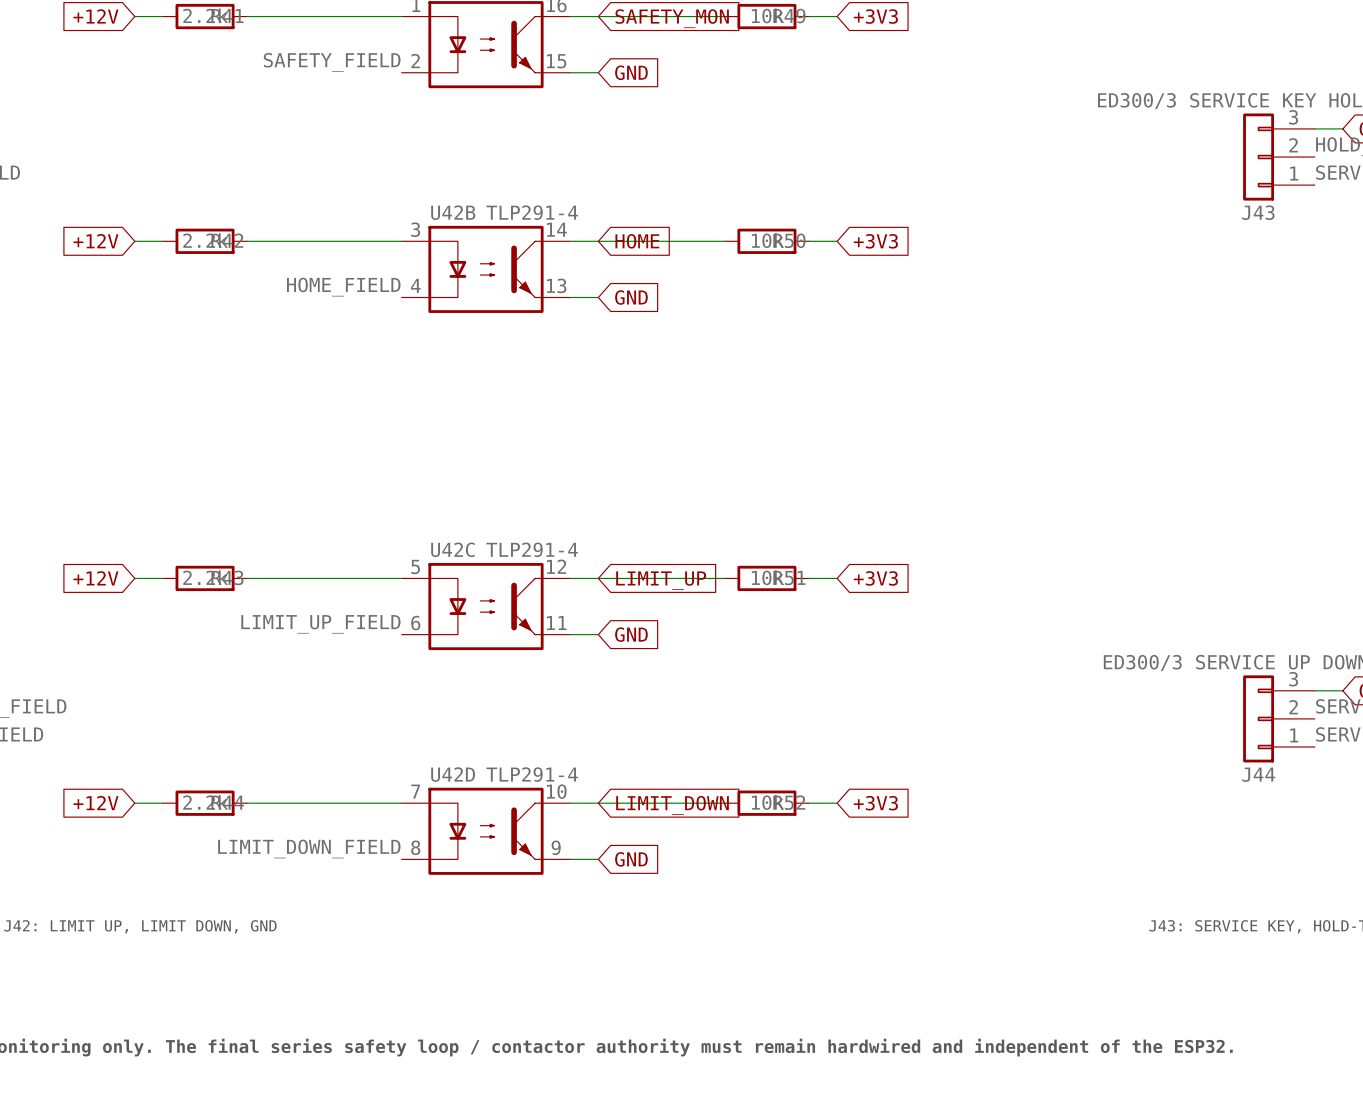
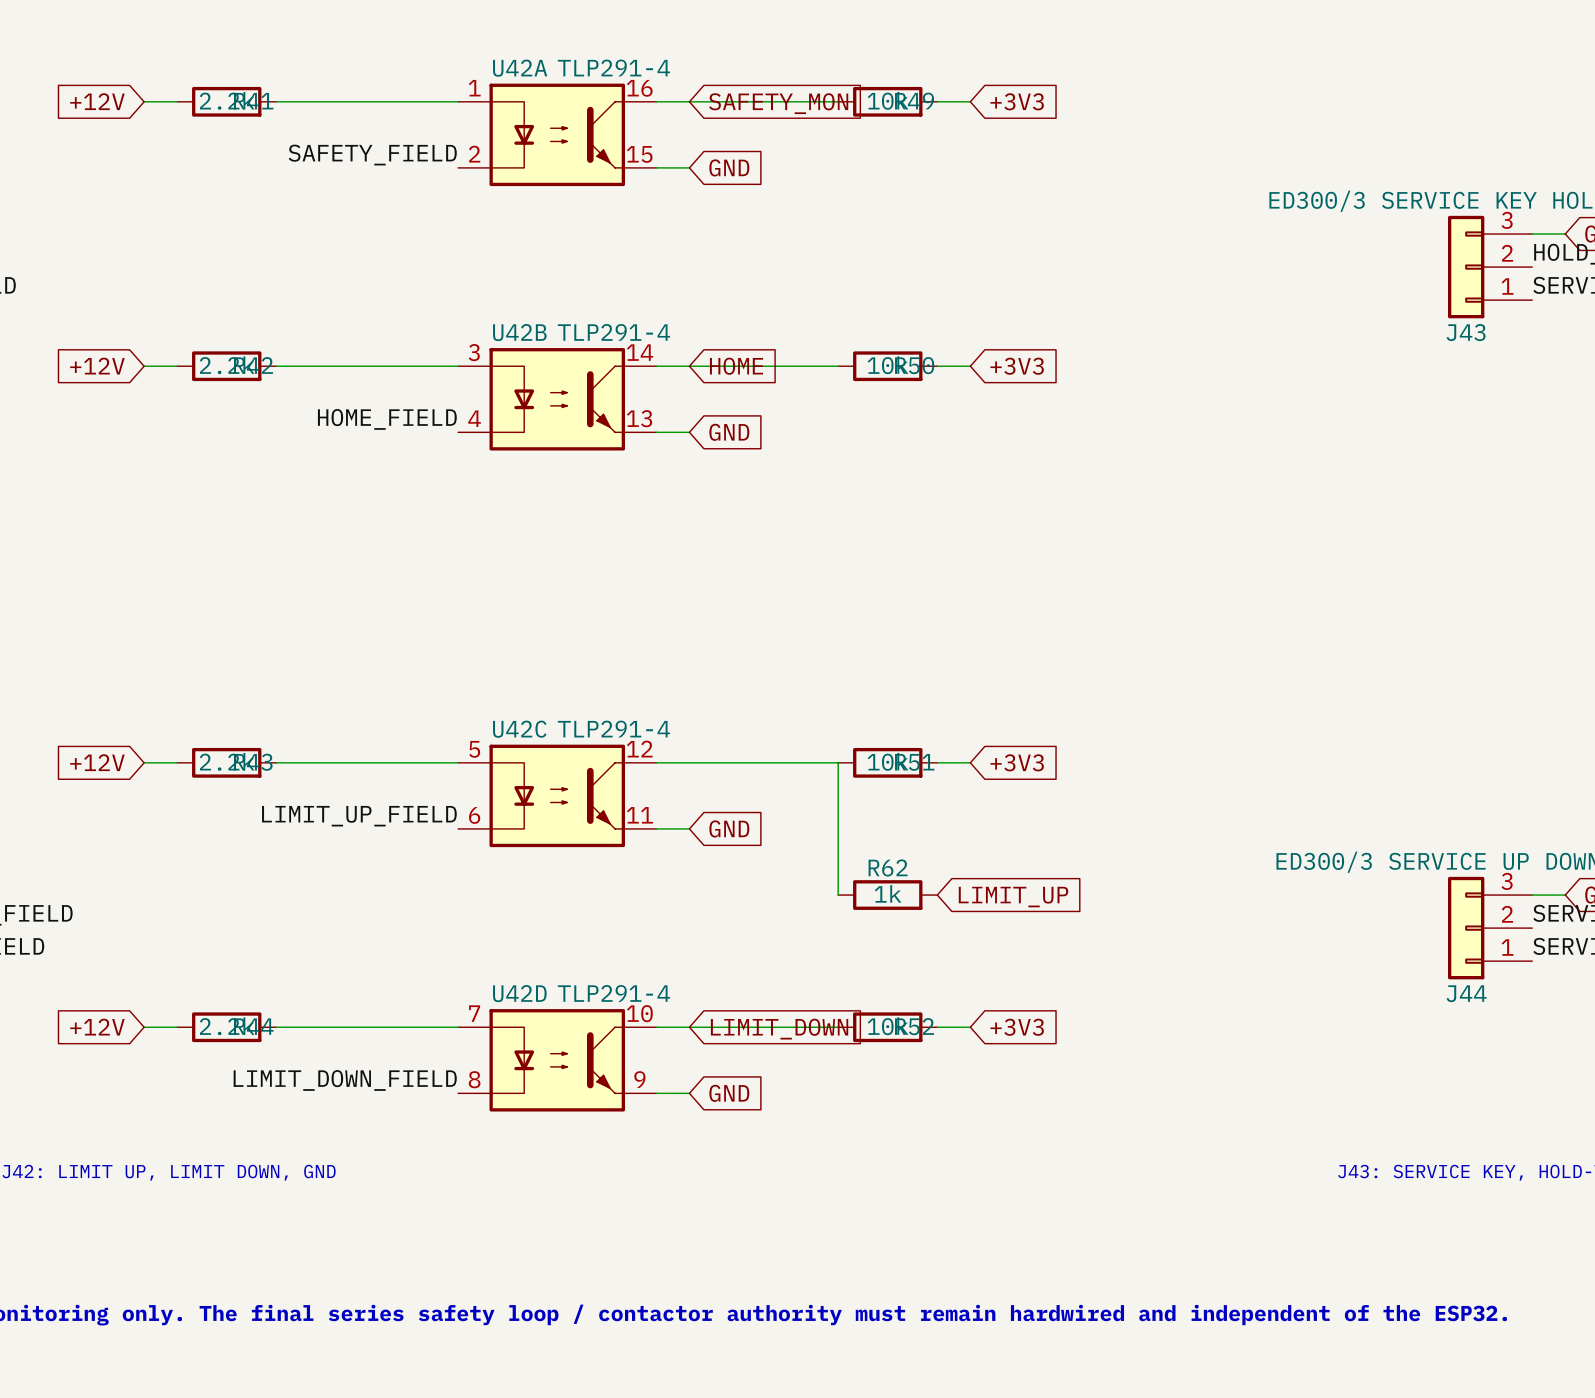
wire: none -> (838, 762) (838, 895)
global label position: LIMIT_UP (661, 580) -> LIMIT_UP (1013, 897)
R62: none -> 1k (887, 895)

